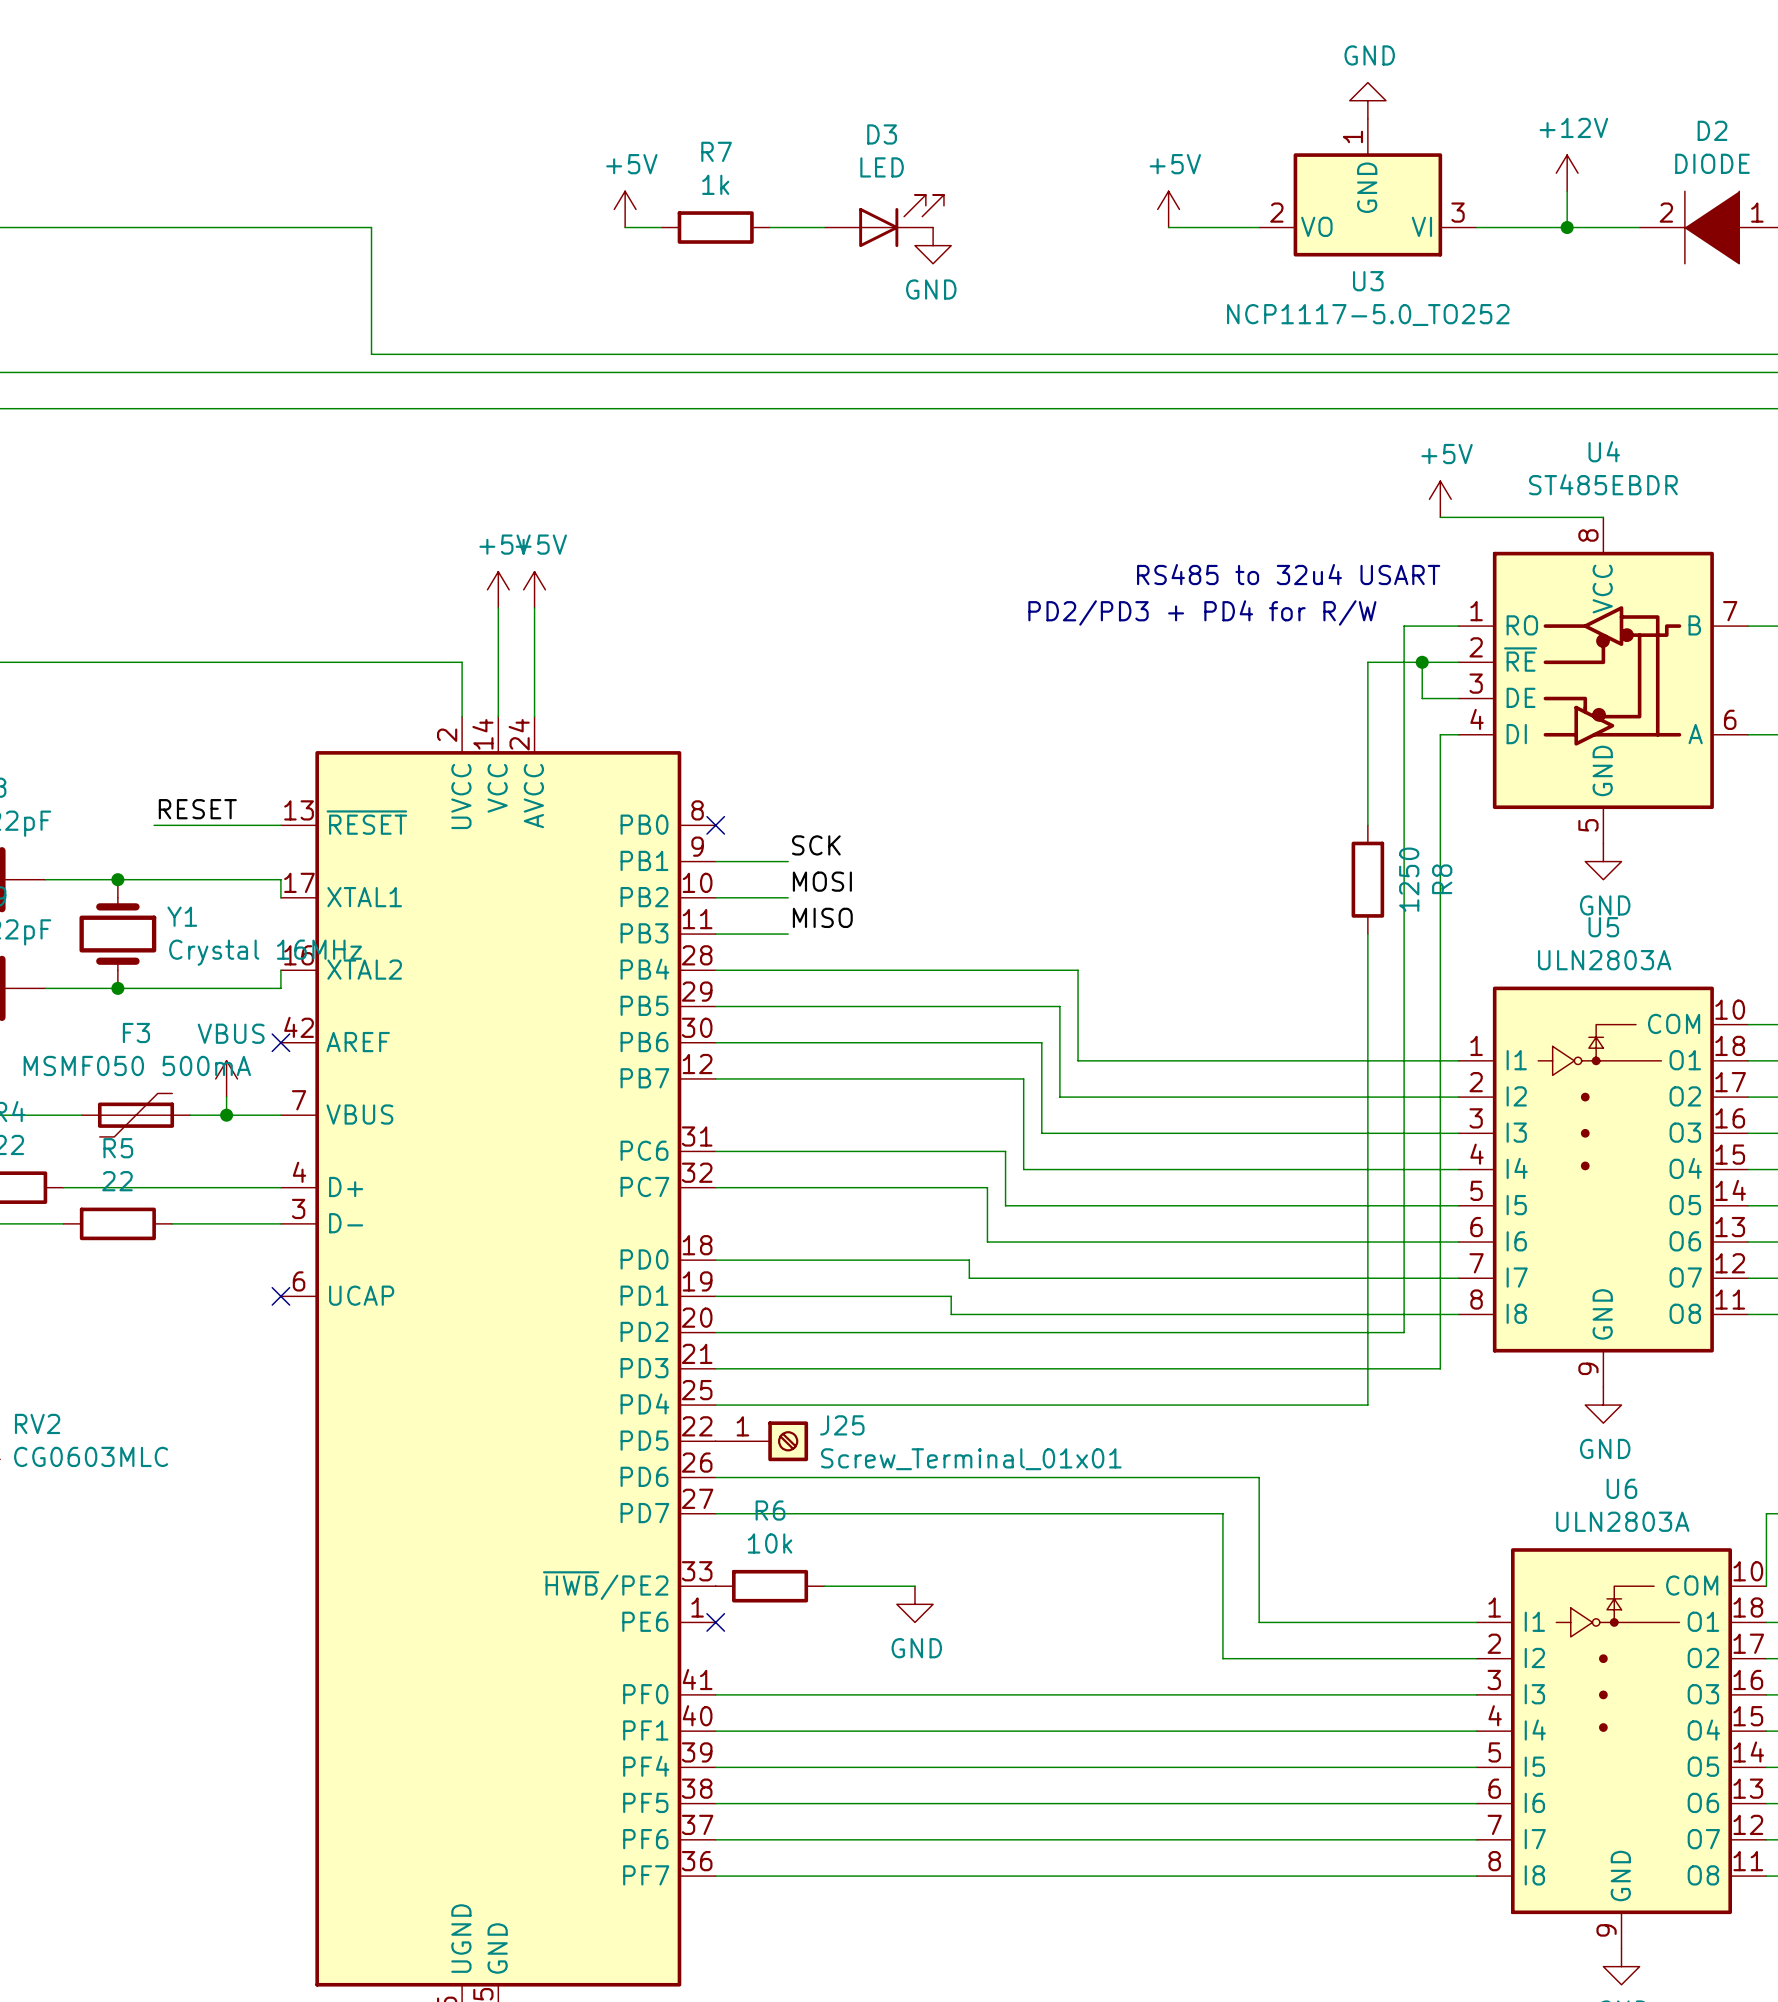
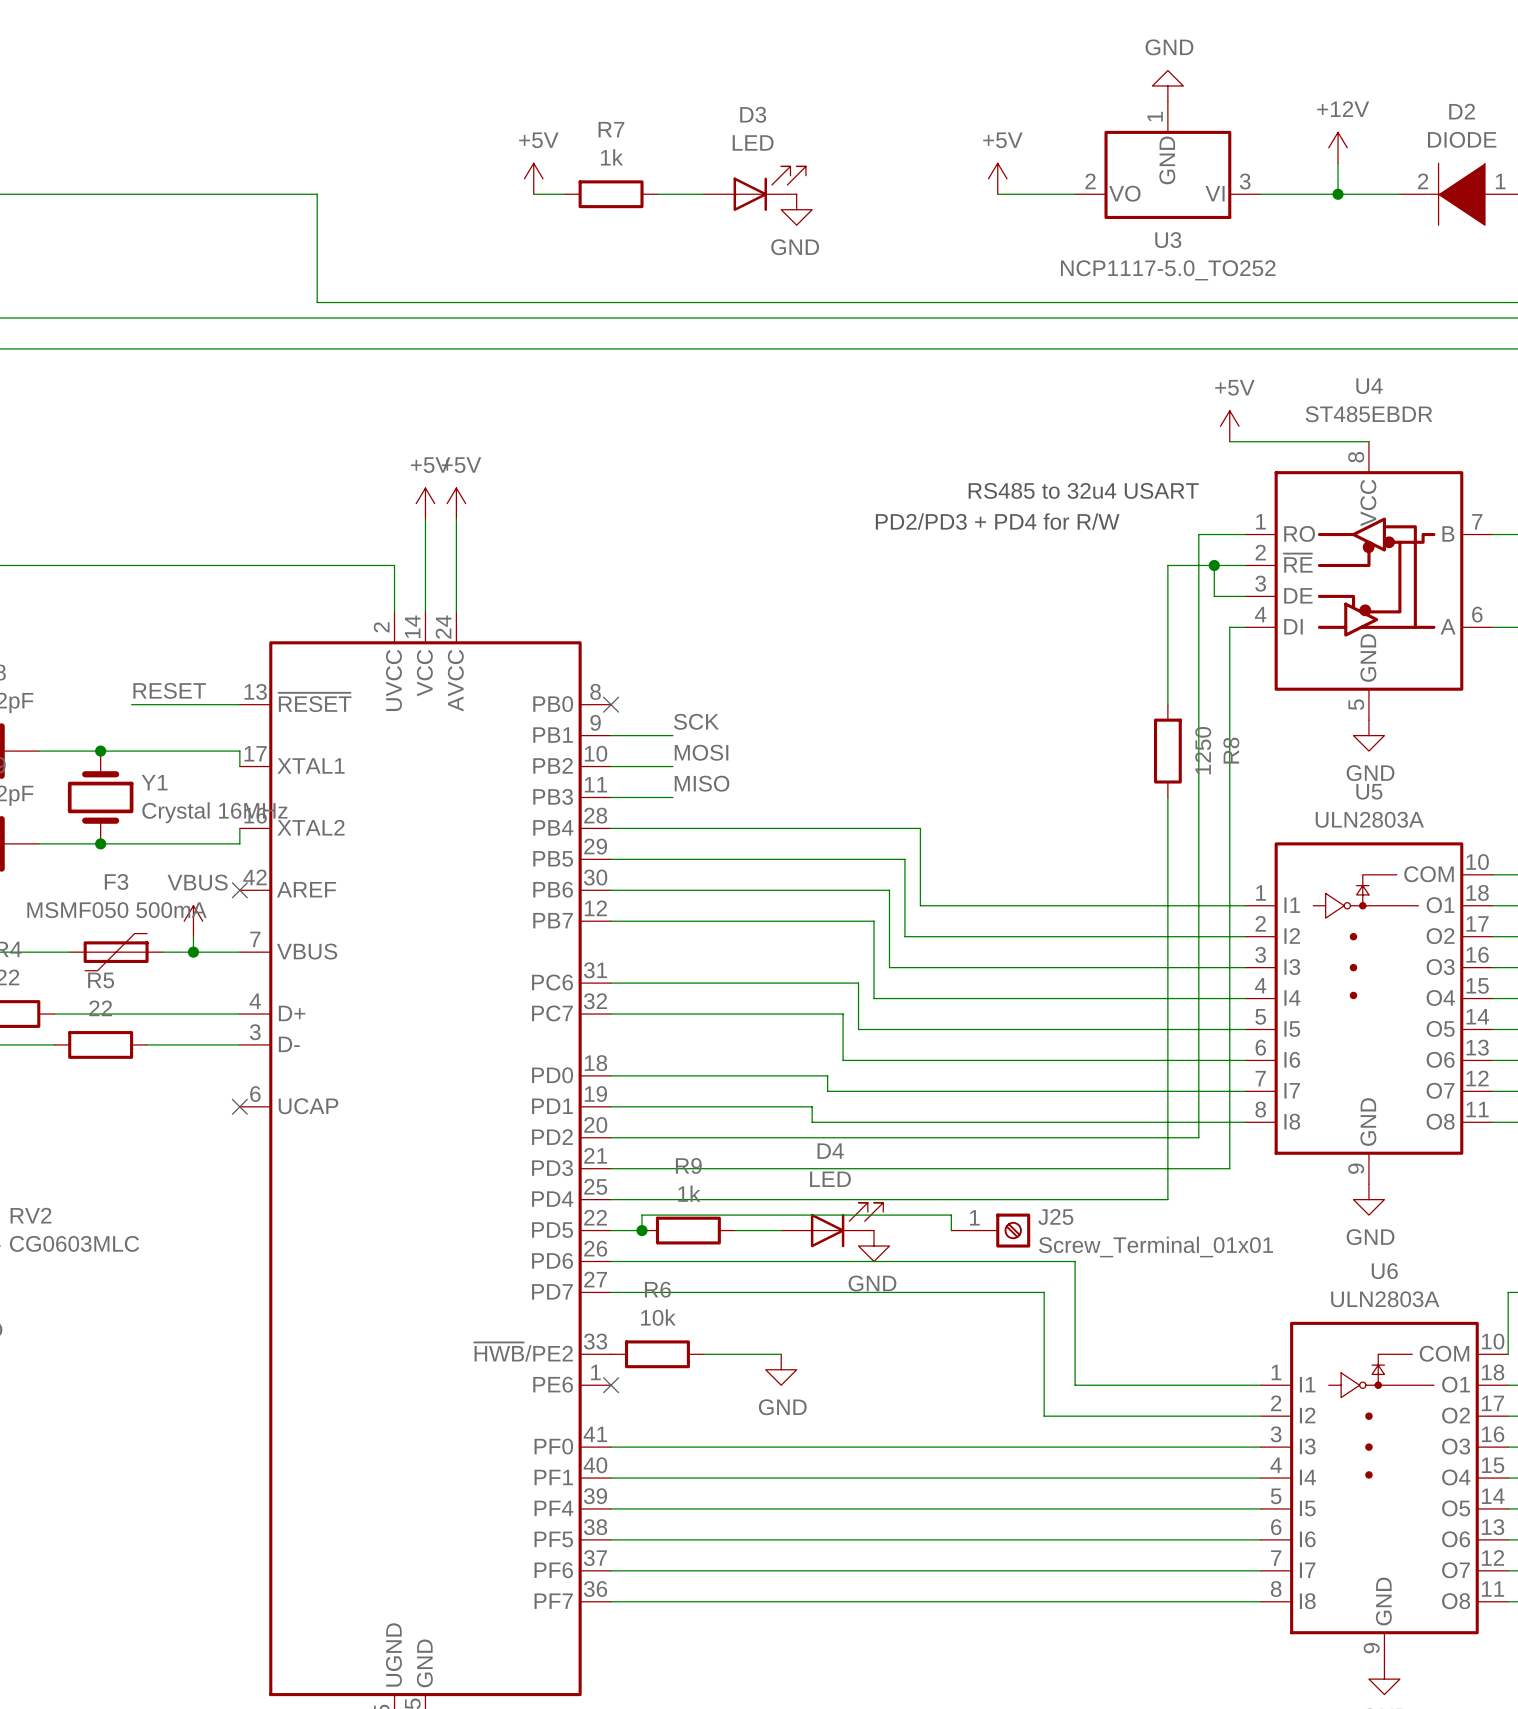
D4: none -> LED (832, 1224)
wire: none -> (611, 1230) (642, 1230) (642, 1215) (951, 1215) (951, 1230)
junction: none -> (642, 1230)
J25 position: (761, 1441) -> (990, 1230)
R9: none -> 1k (688, 1230)
wire: none -> (734, 1230) (781, 1230)
power symbol: none -> GND (874, 1246)

